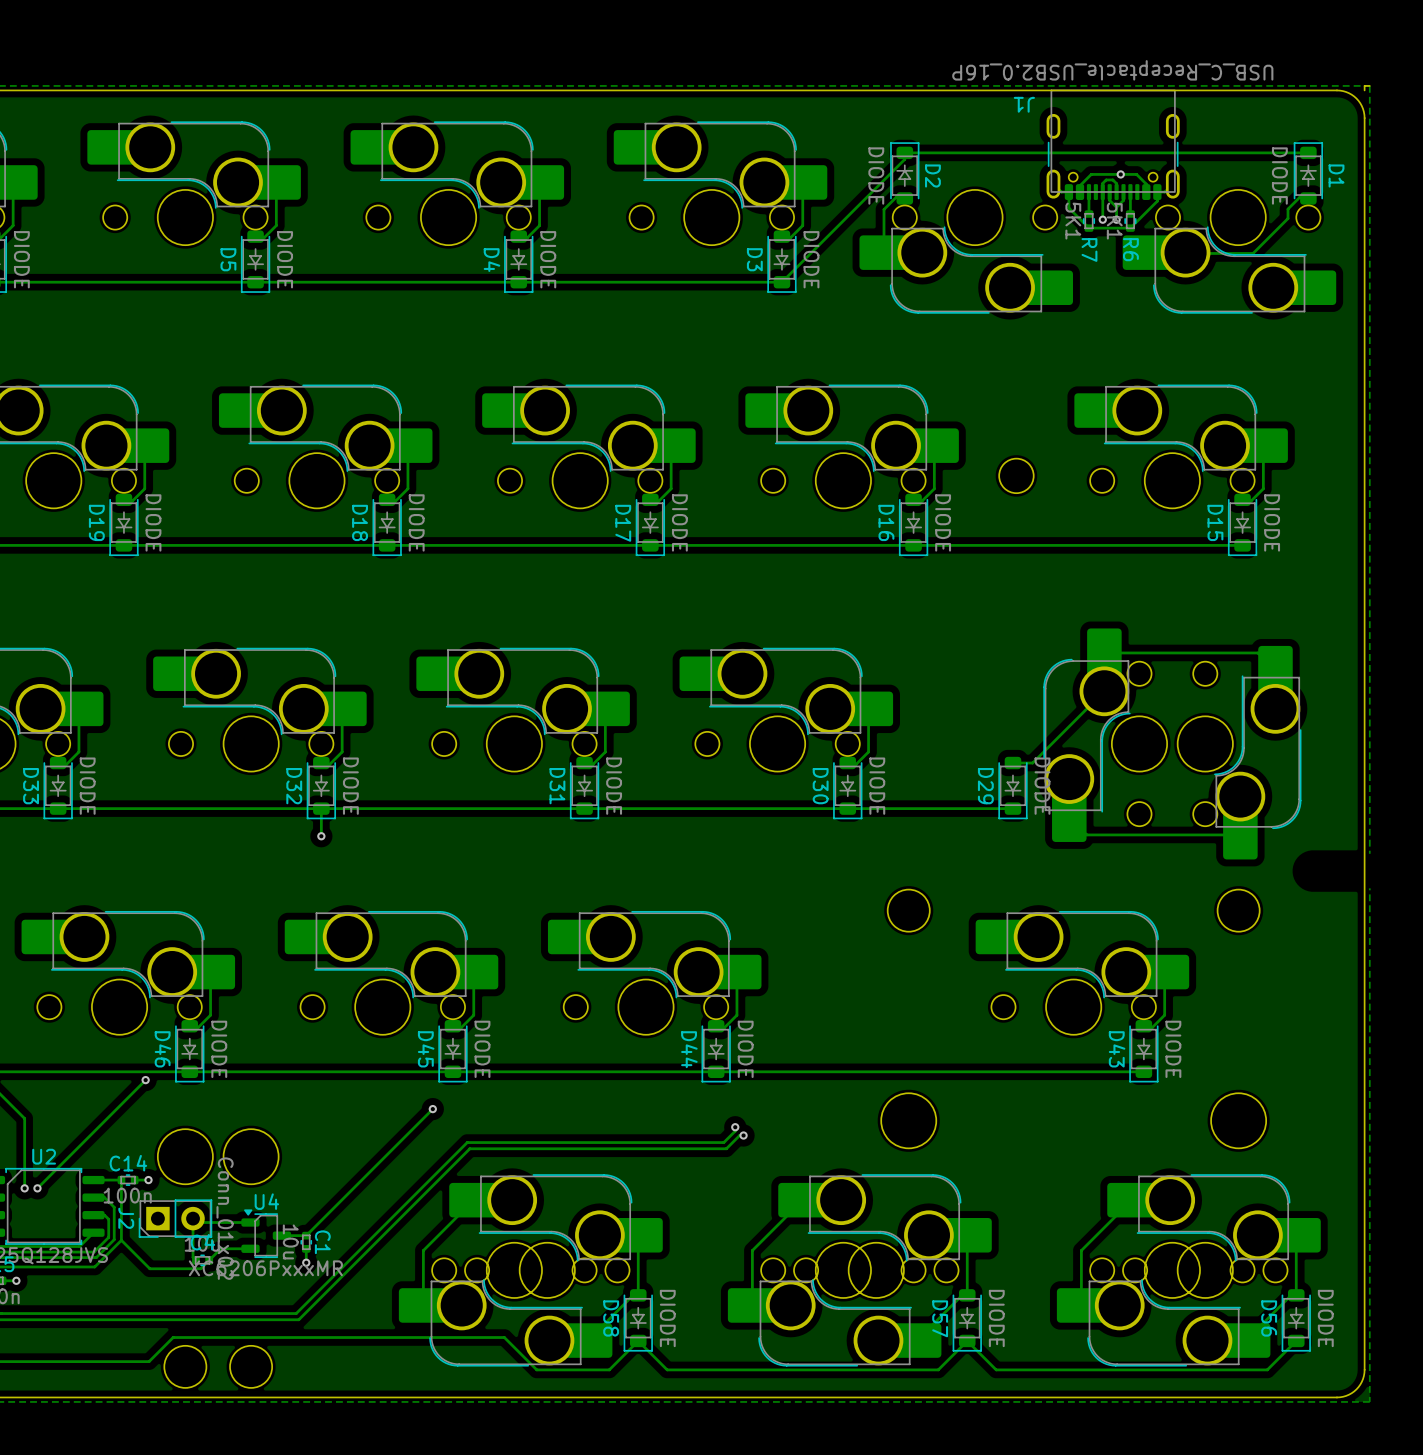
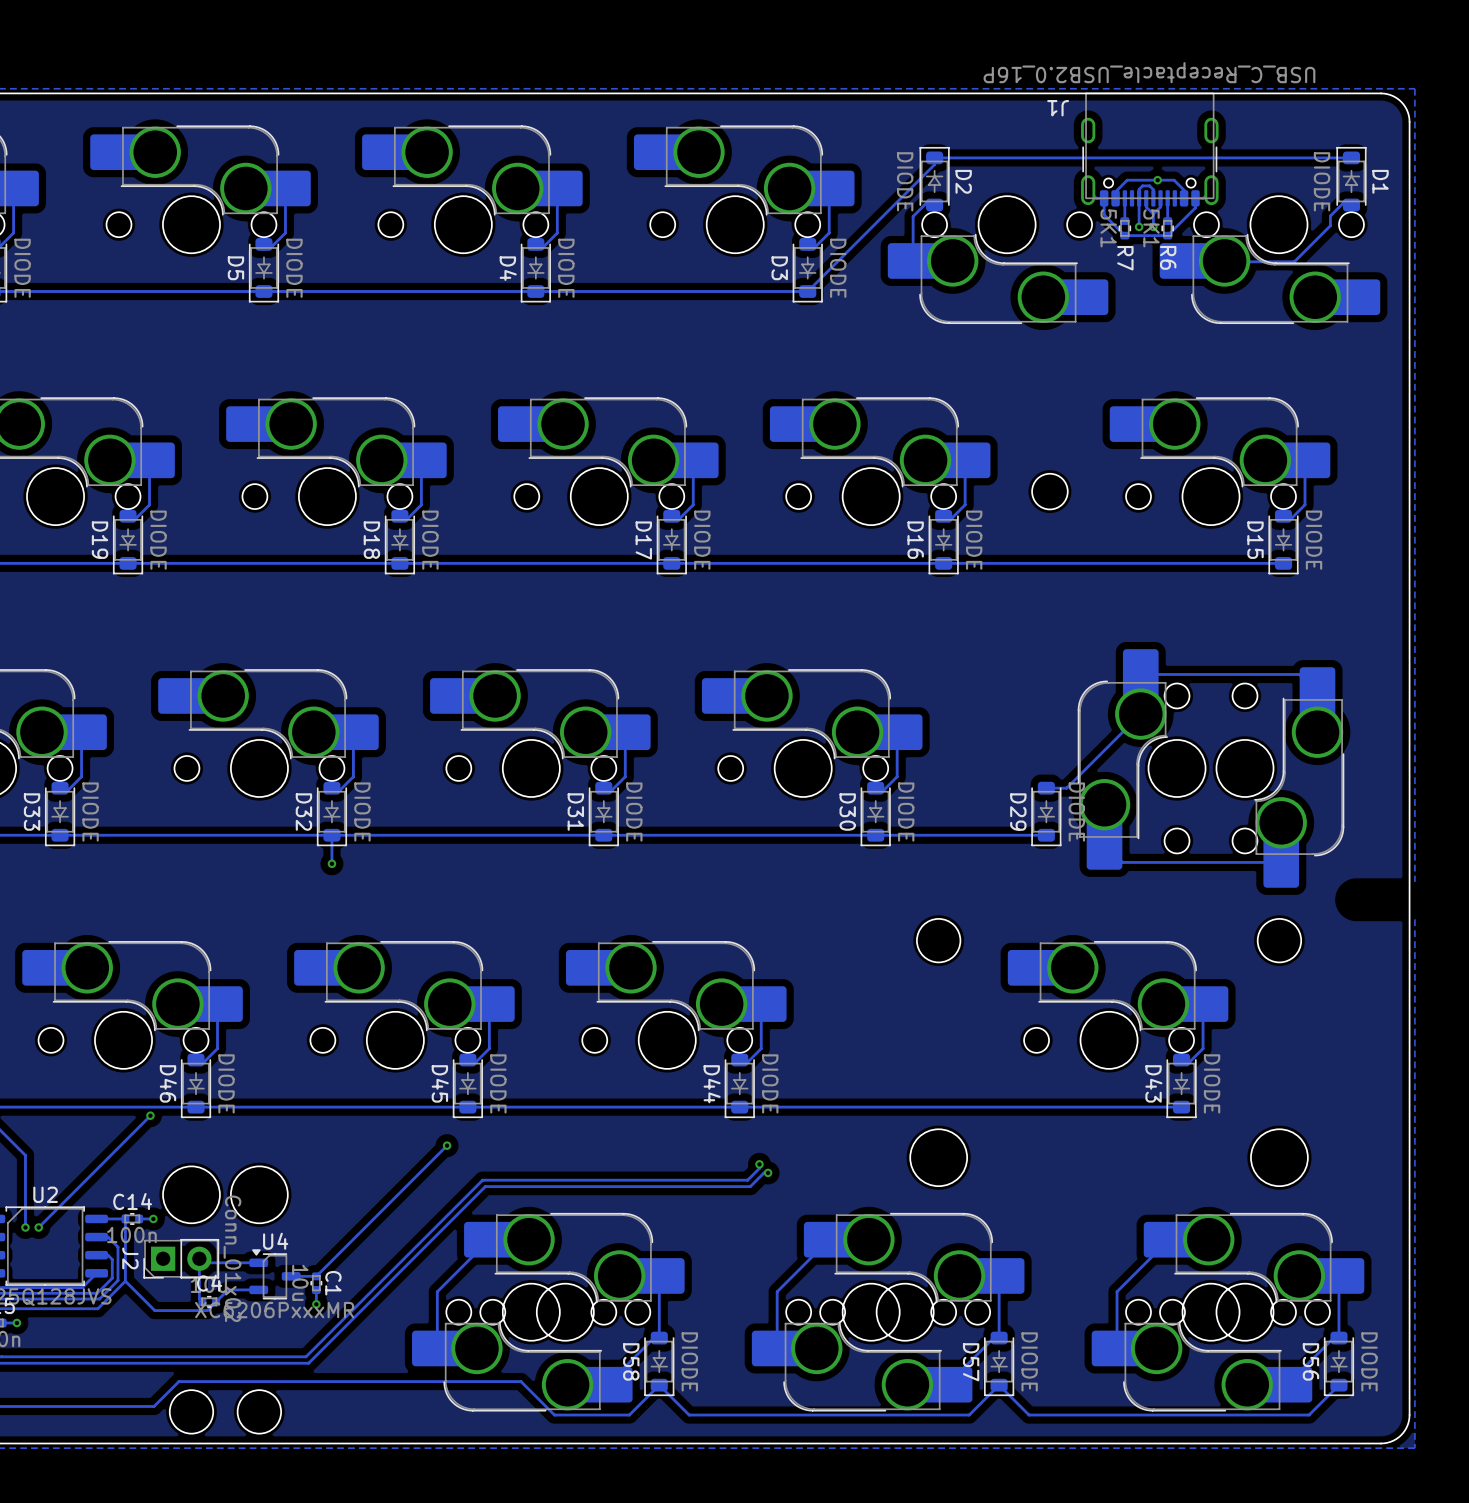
board edge: (1369, 85) (1364, 85) (1364, 90) -> none

